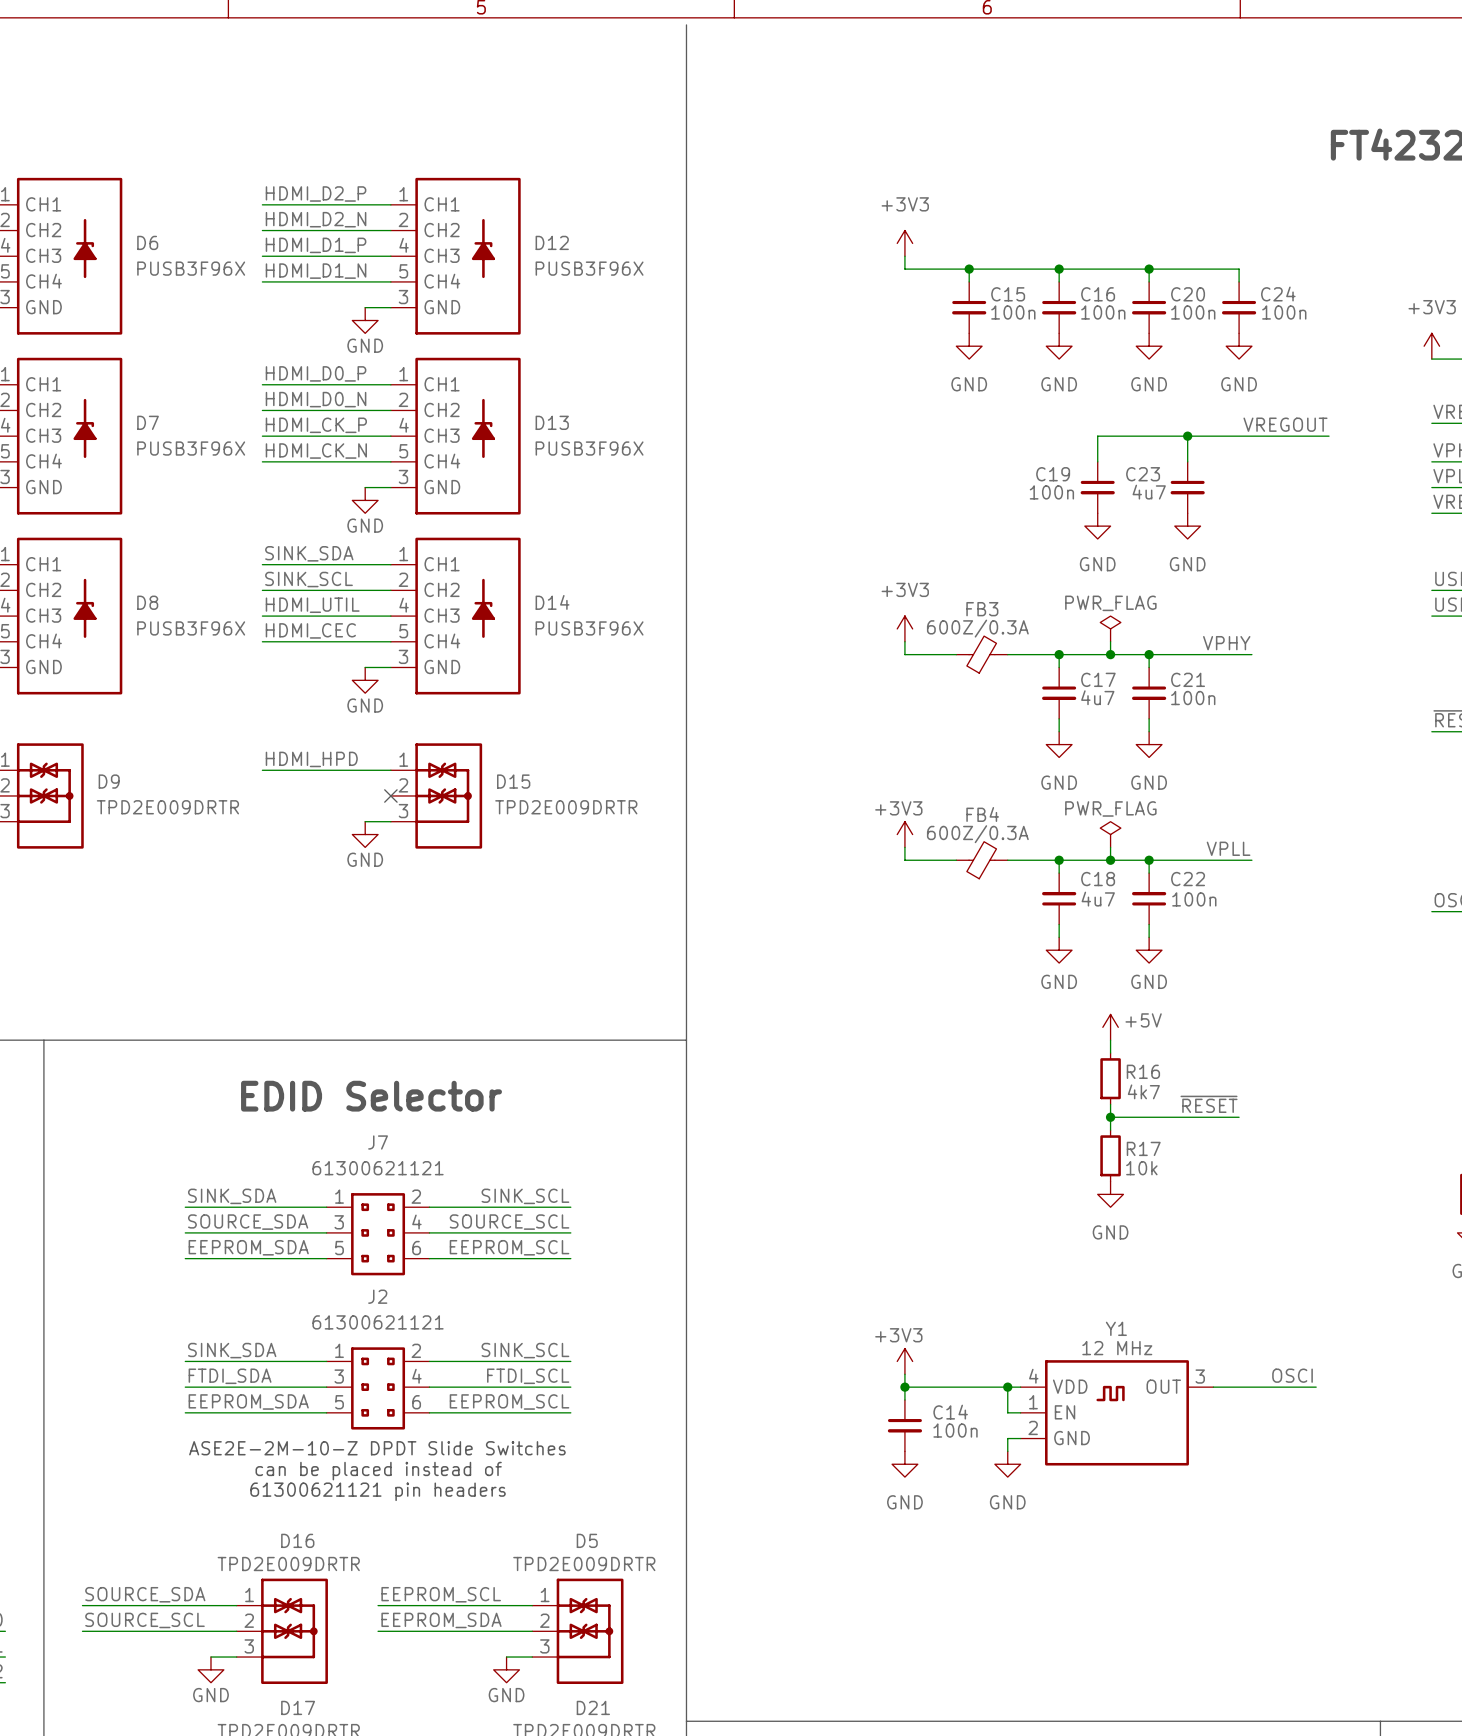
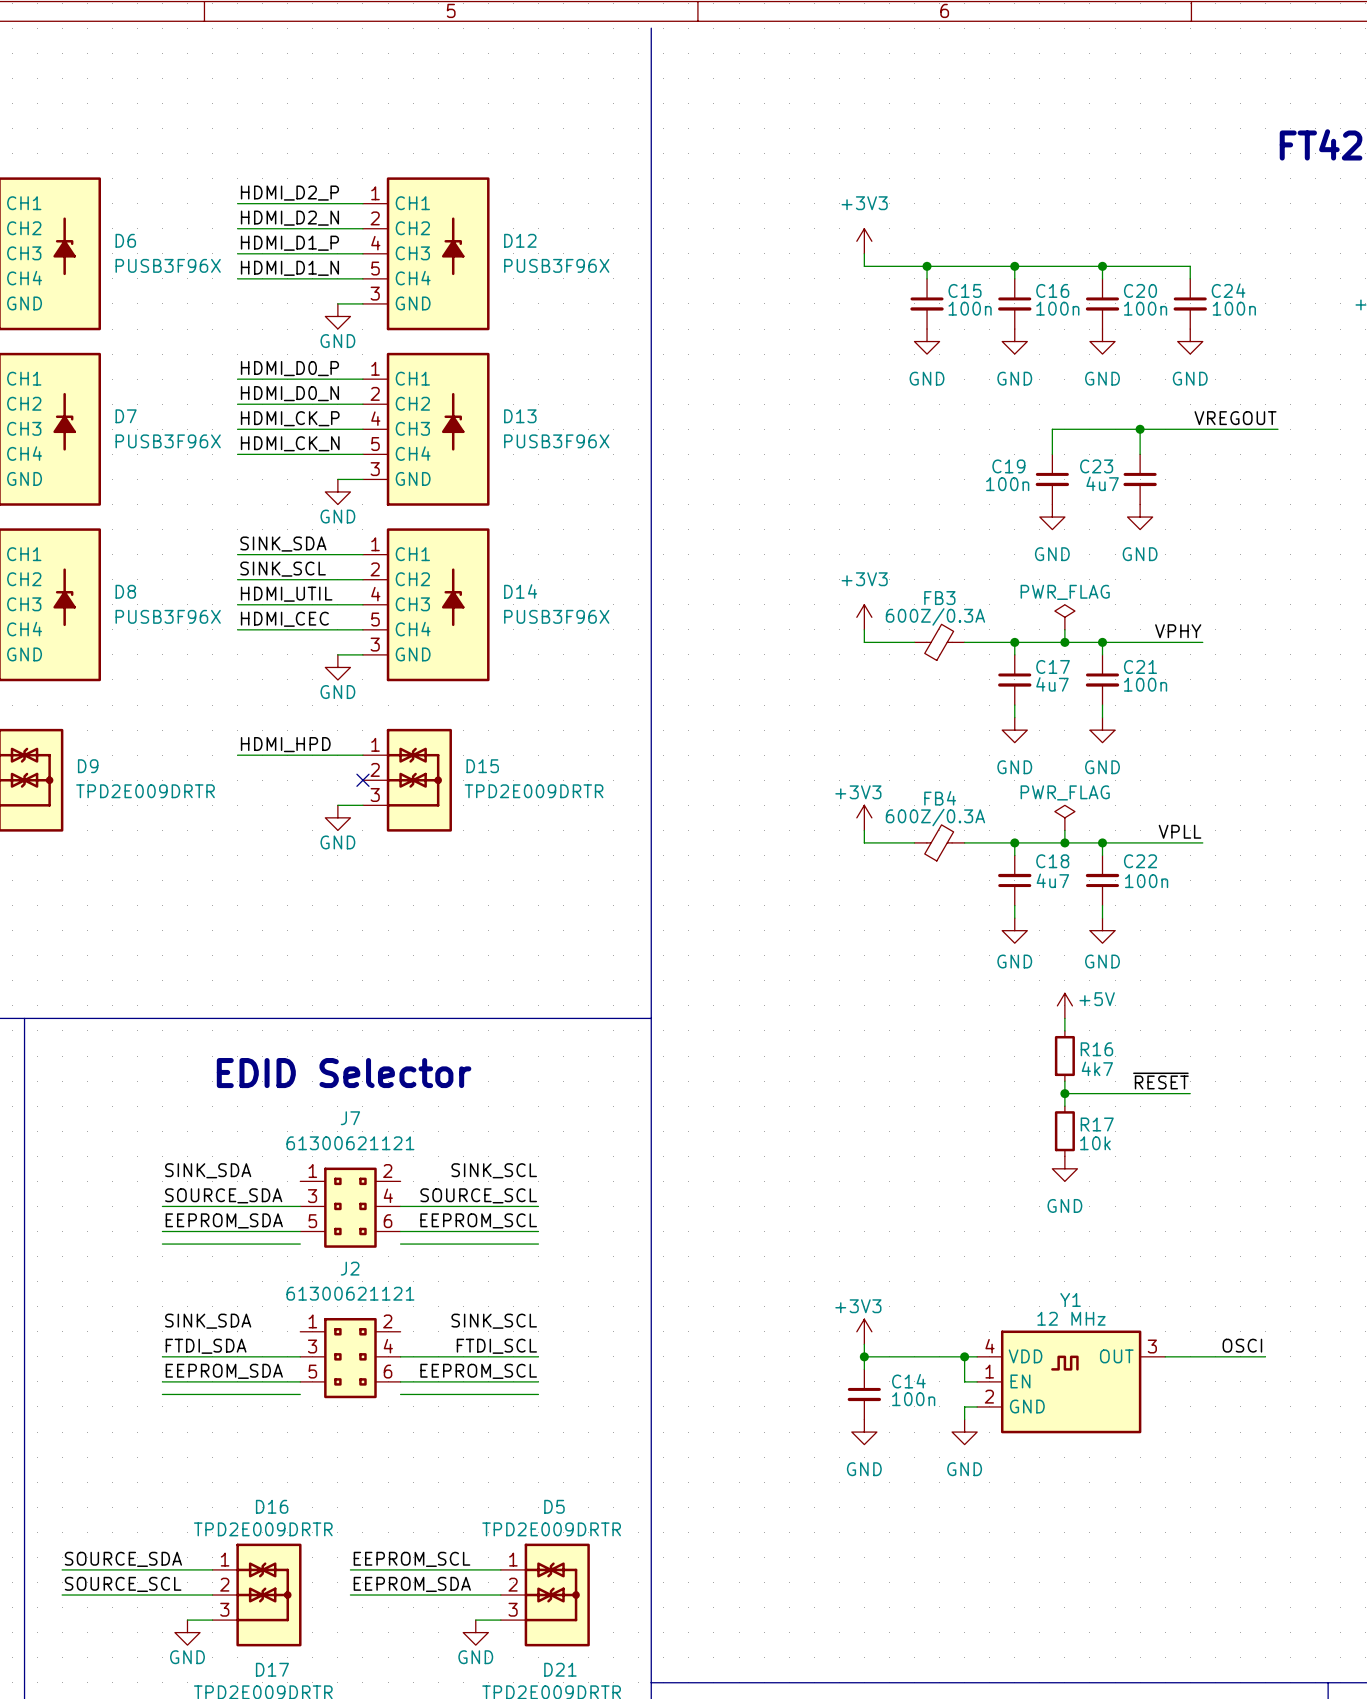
wire: (185, 1207) (326, 1207) -> (162, 1244) (300, 1244)
wire: (429, 1207) (570, 1207) -> (400, 1244) (538, 1244)
wire: (185, 1361) (326, 1361) -> (162, 1394) (300, 1394)
wire: (429, 1361) (570, 1361) -> (400, 1394) (538, 1394)
text: ASE2E-2M-10-Z DPDT Slide Switches (377, 1448) -> none
text: can be placed instead of (378, 1471) -> none
text: 61300621121 pin headers (378, 1491) -> none

